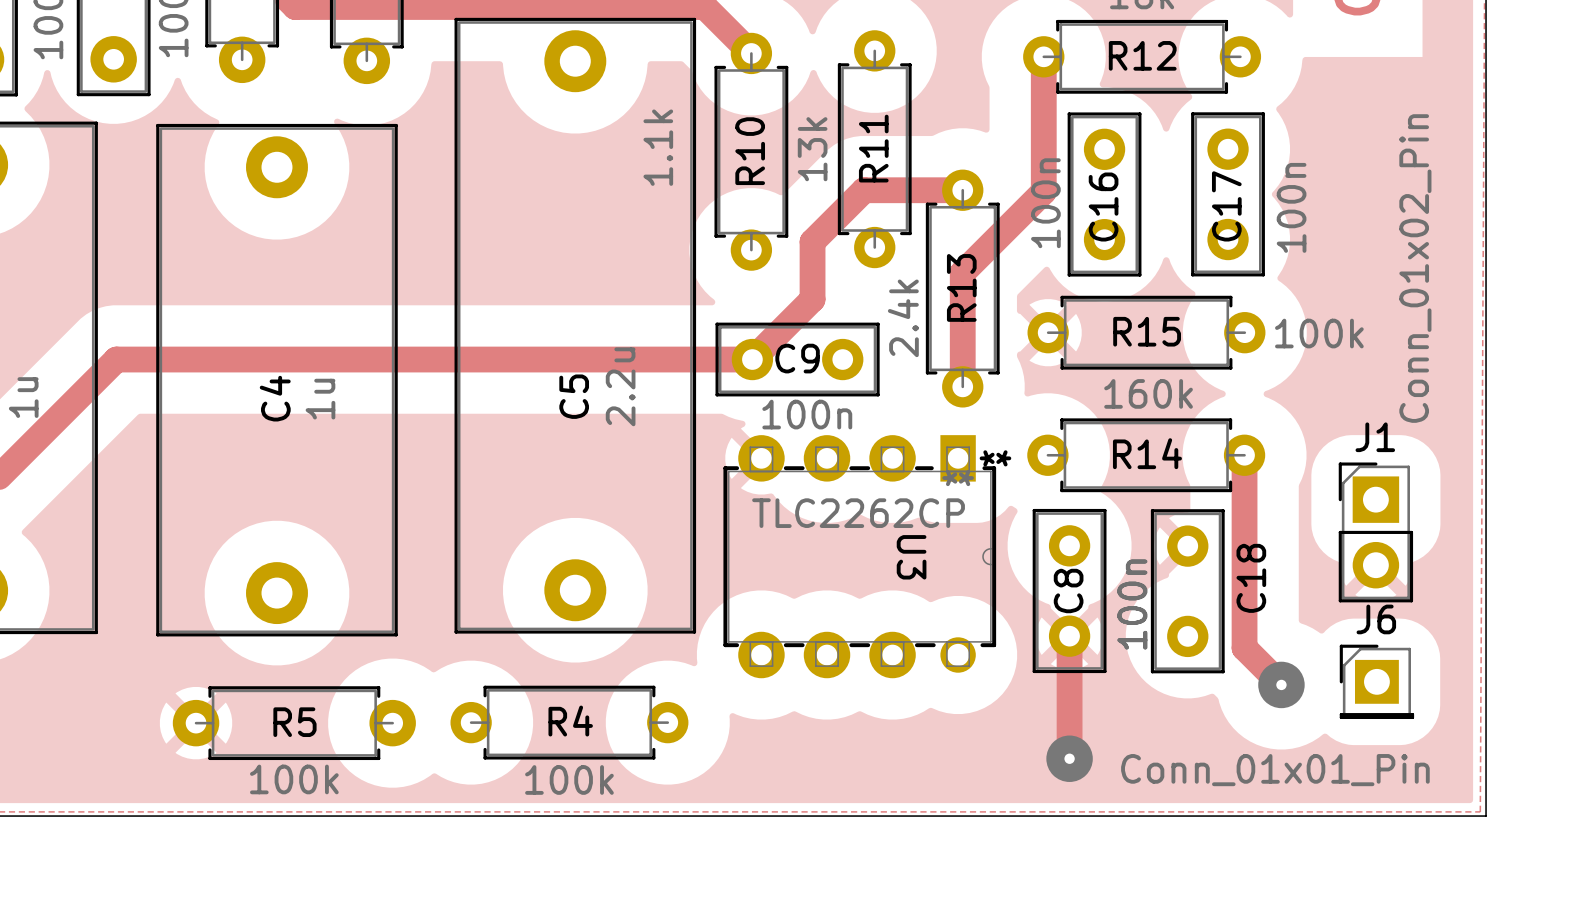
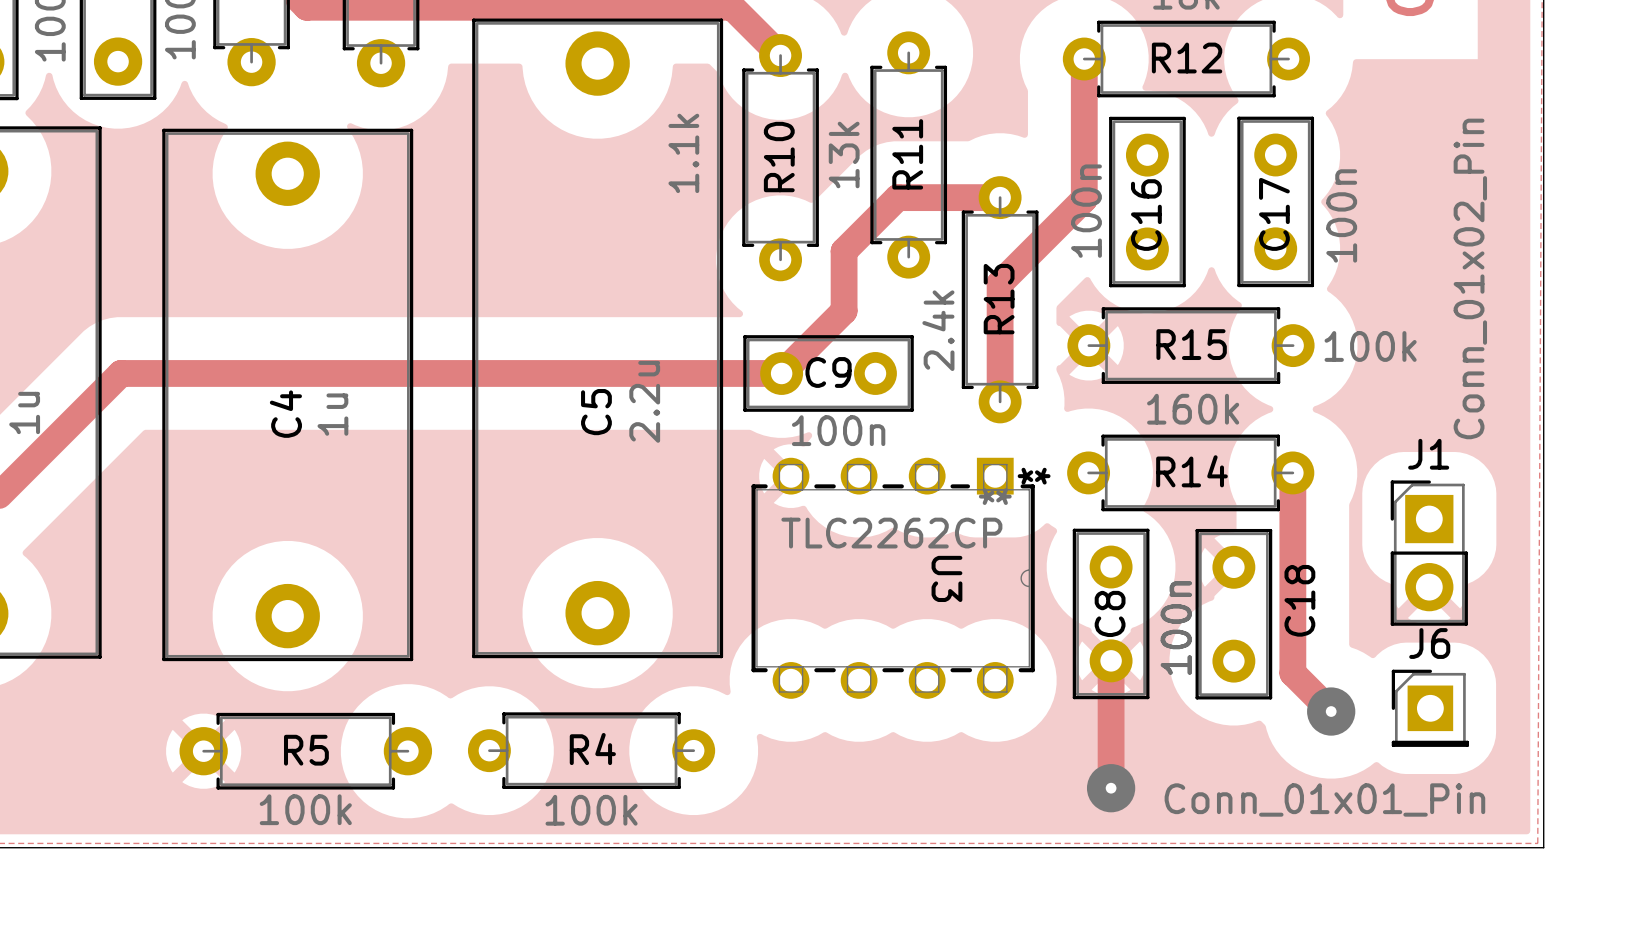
U3 footprint: [723, 435, 997, 679] -> [751, 457, 1035, 699]

